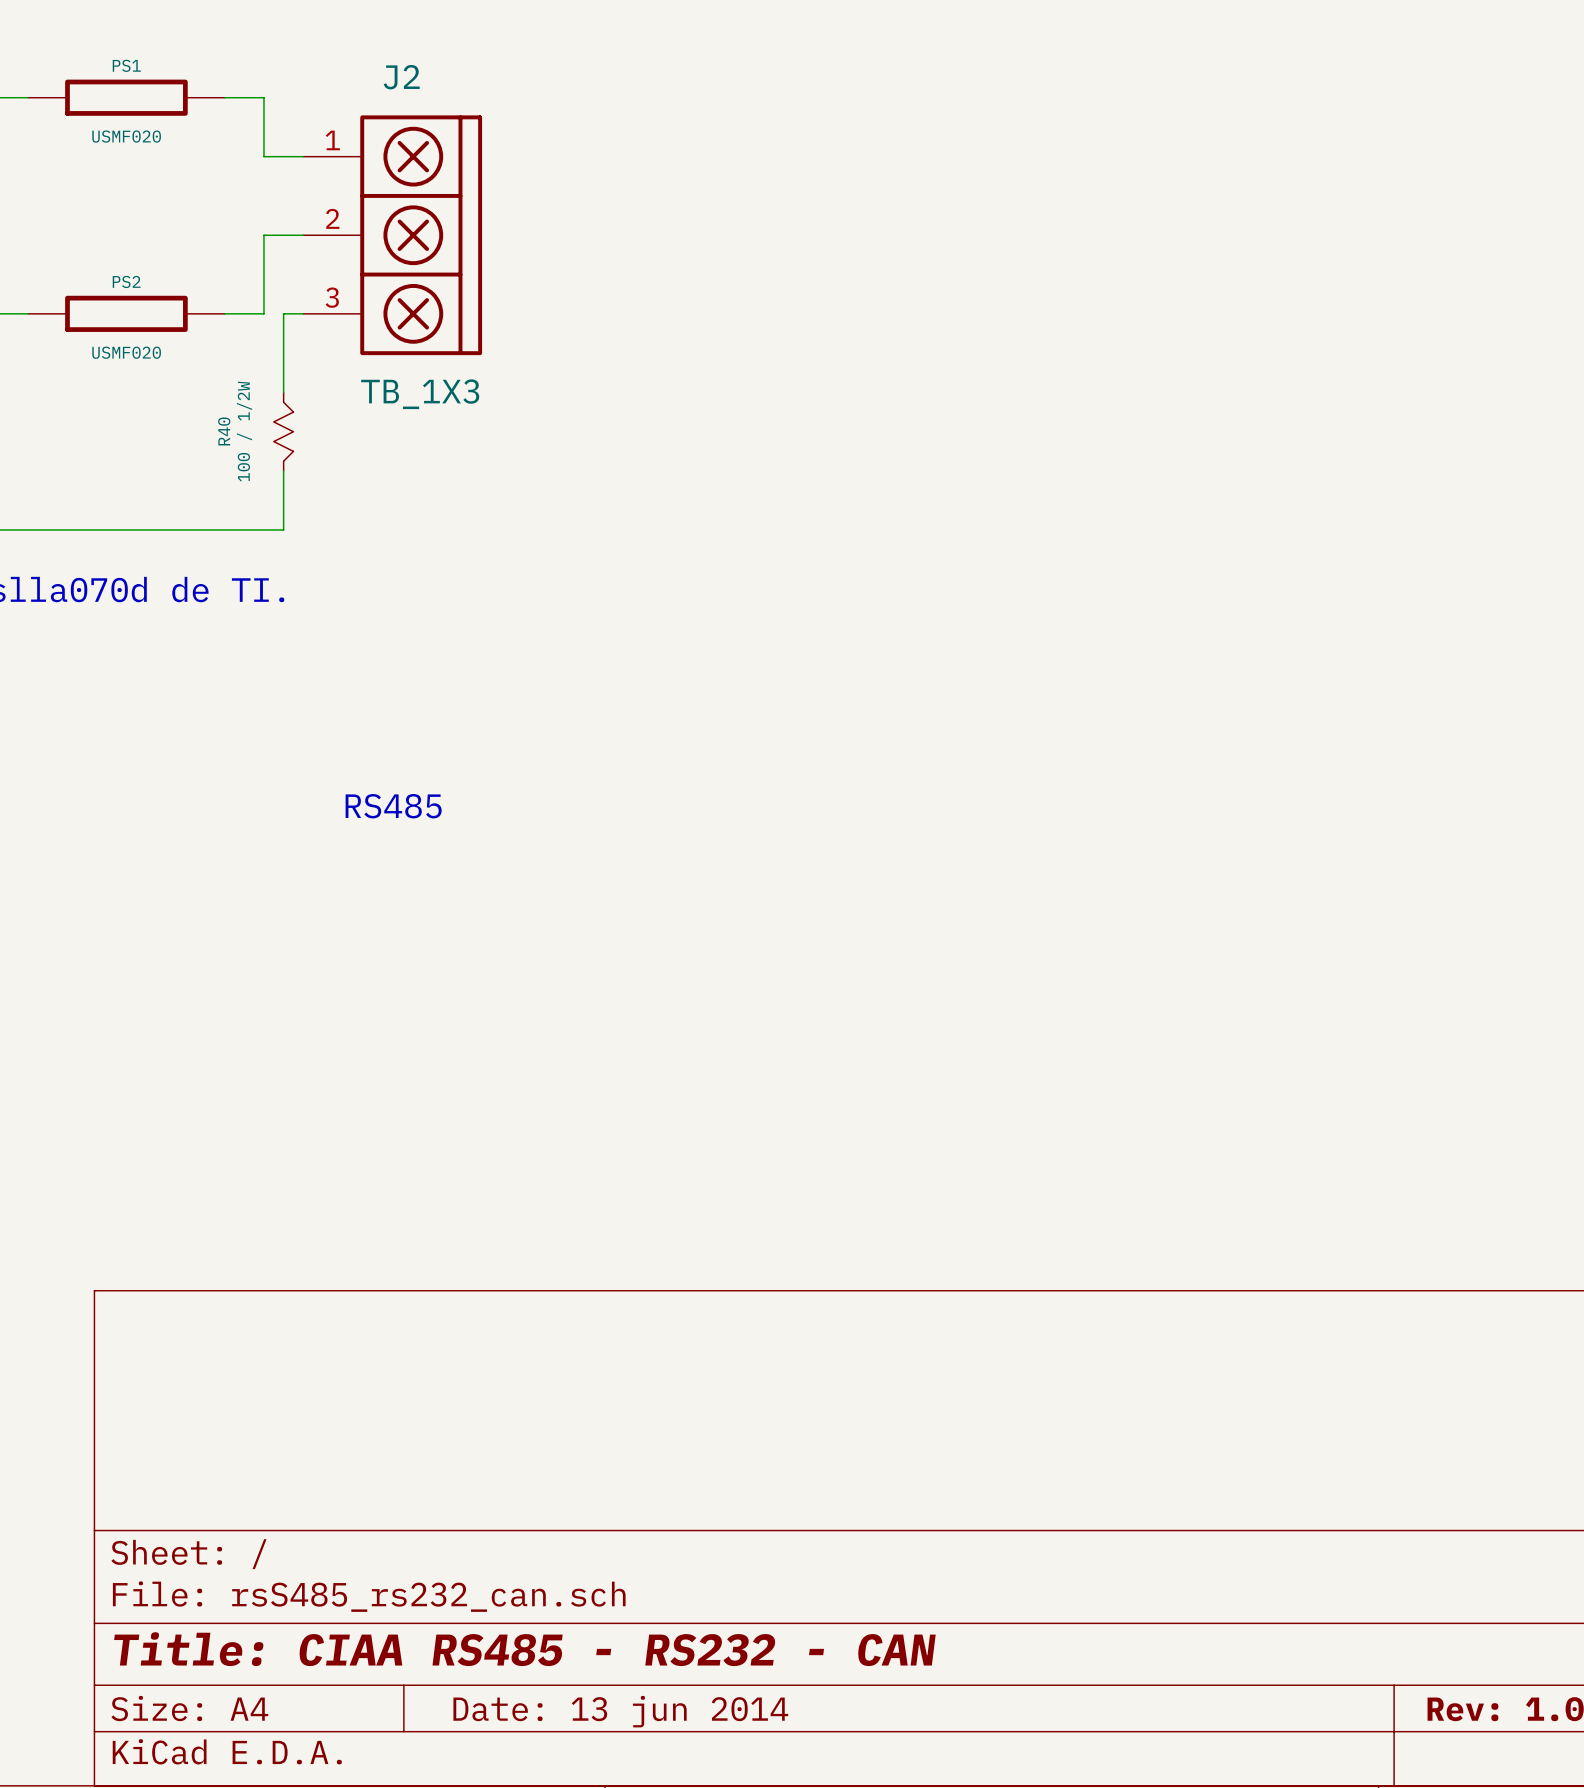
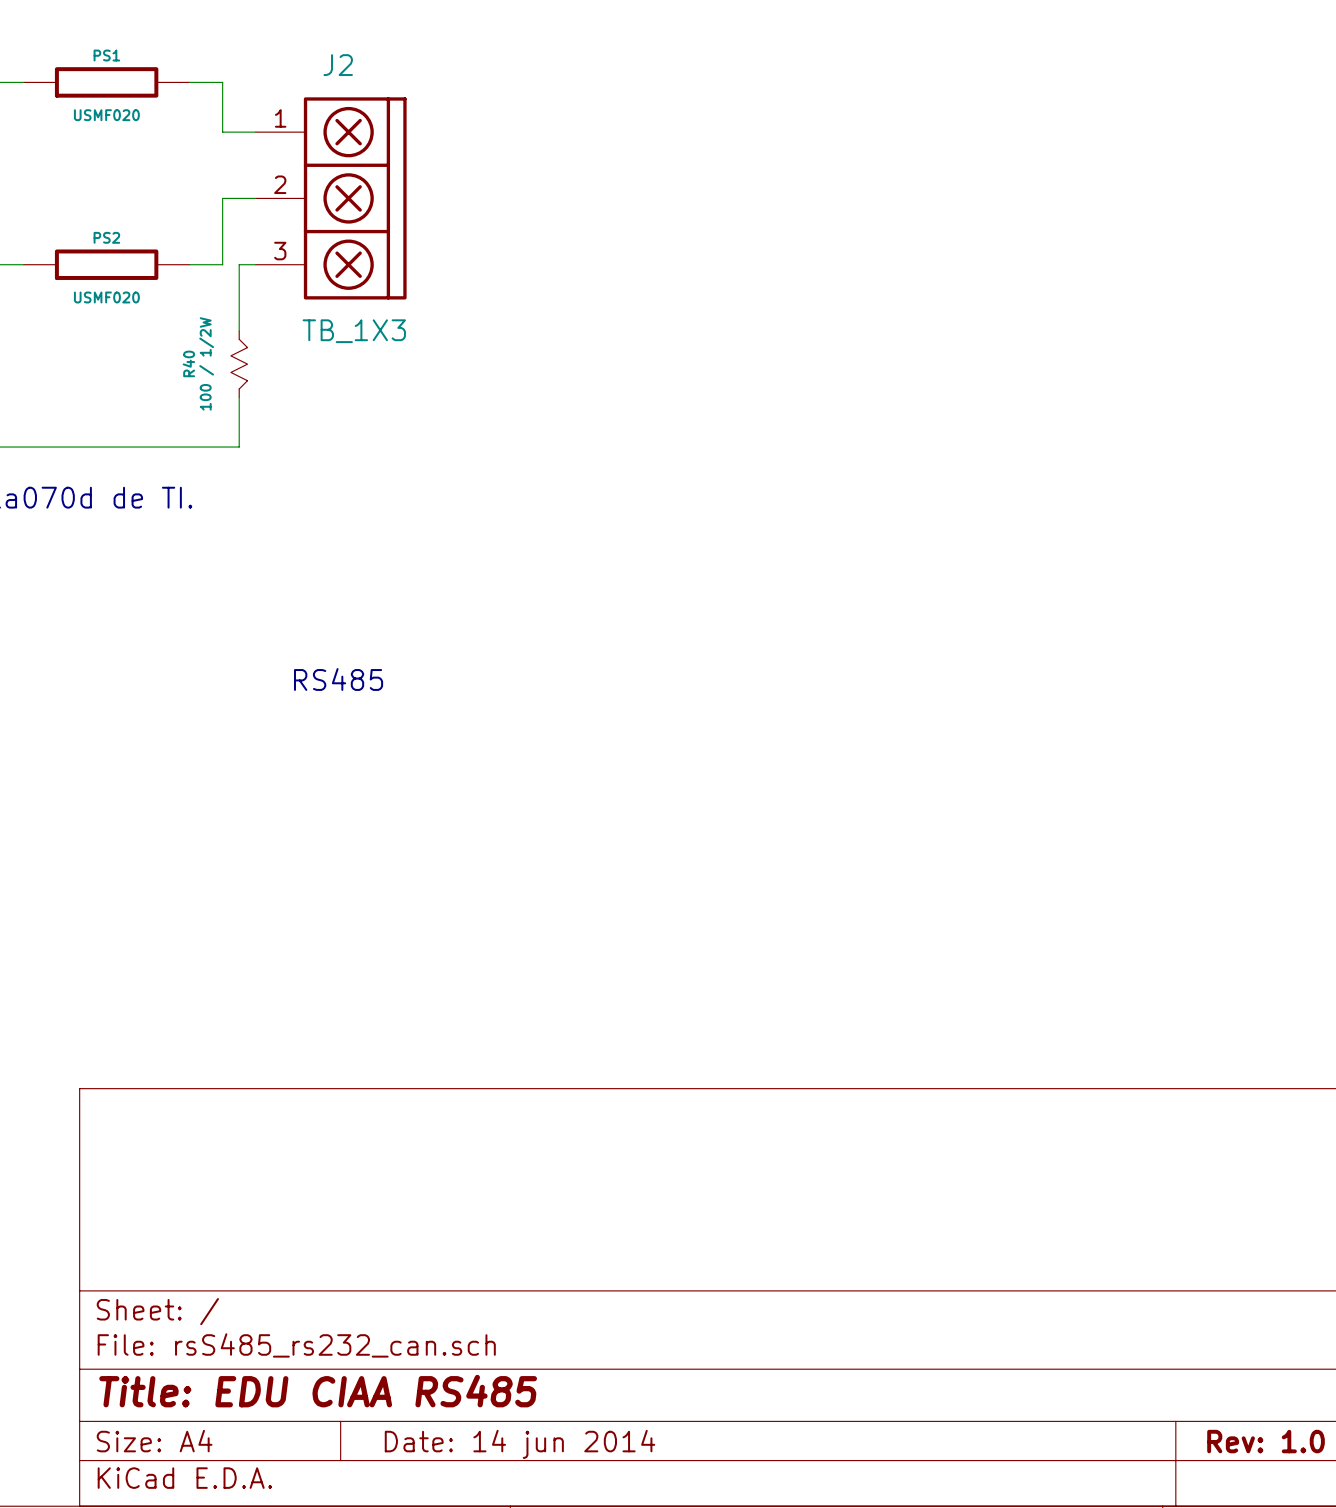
title block: Title: CIAA RS485 - RS232 - CAN (524, 1649) -> Title: EDU CIAA RS485 (318, 1391)
title block: Date: 13 jun 2014 (620, 1711) -> Date: 14 jun 2014 (519, 1444)

